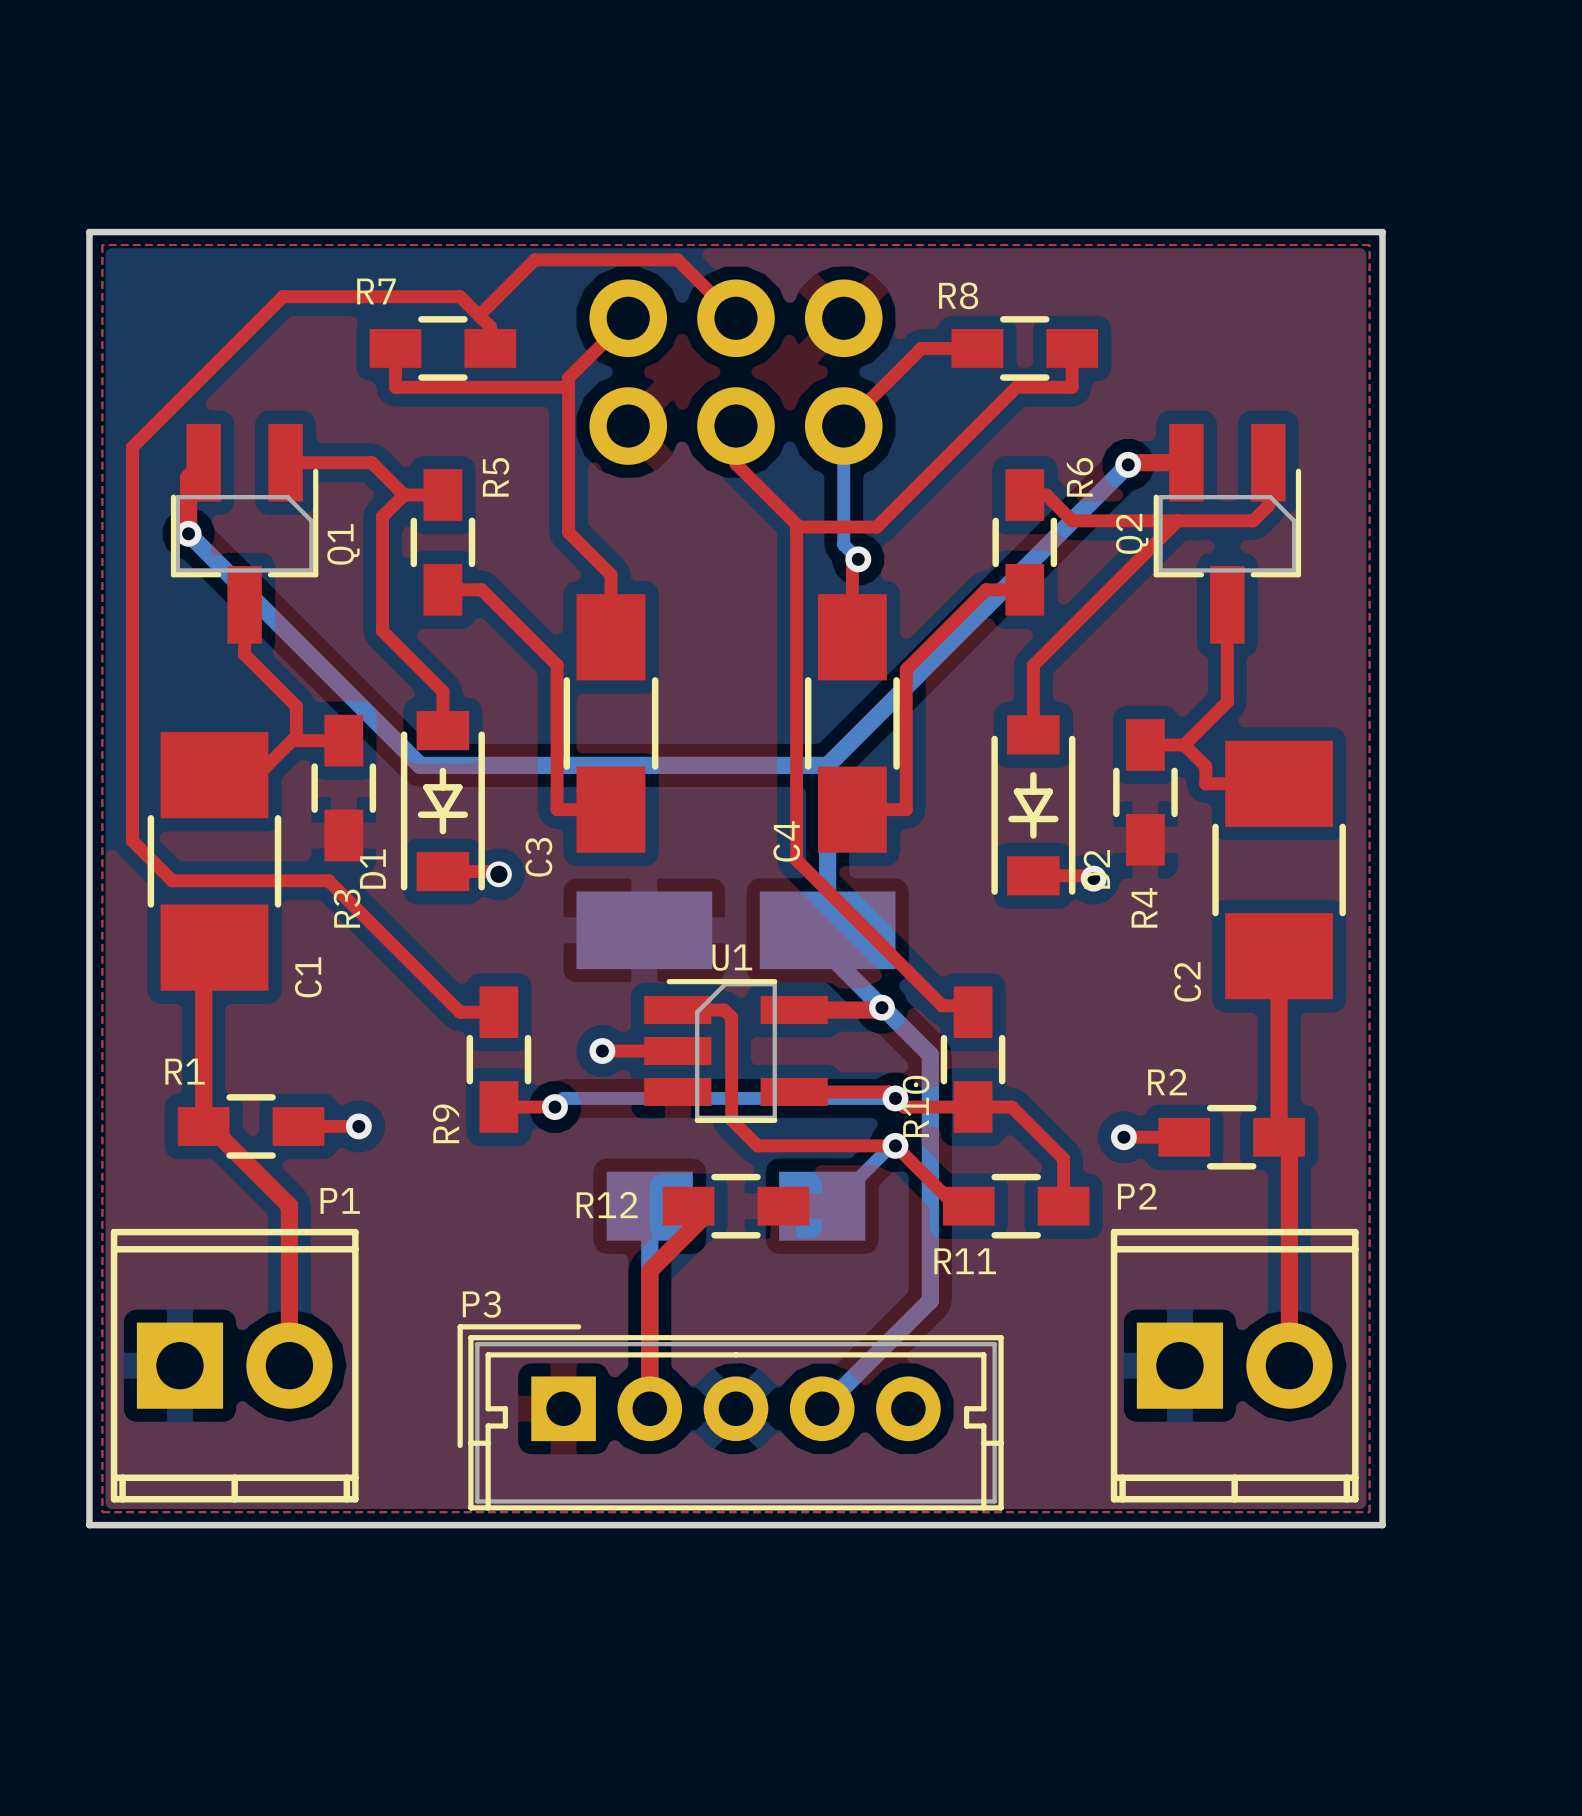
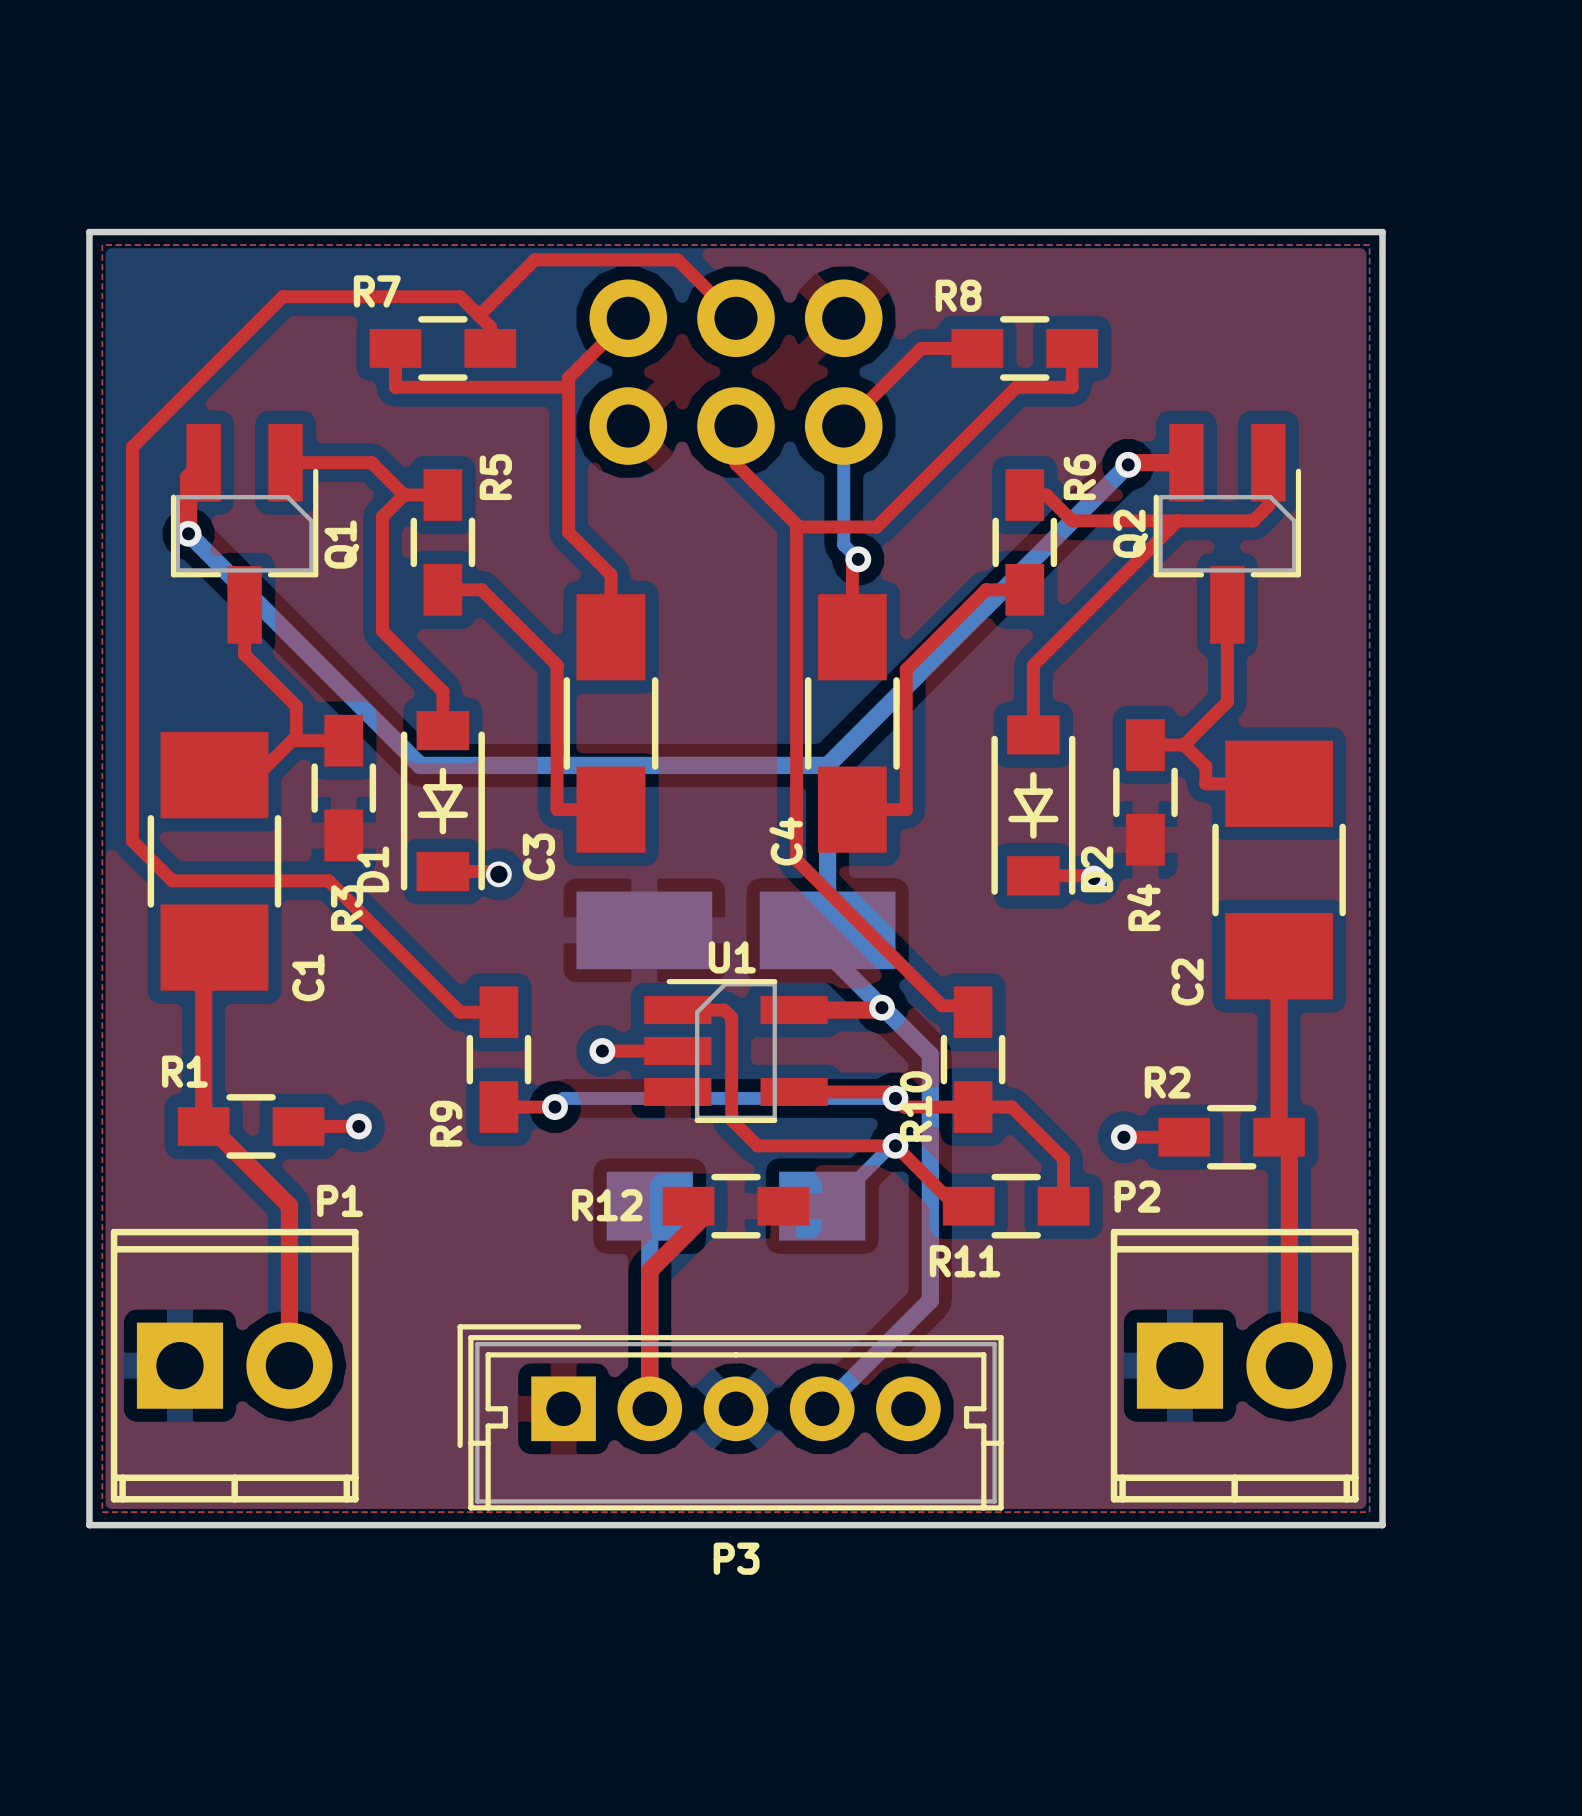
P3 name position: P3 (481, 1304) -> P3 (736, 1558)

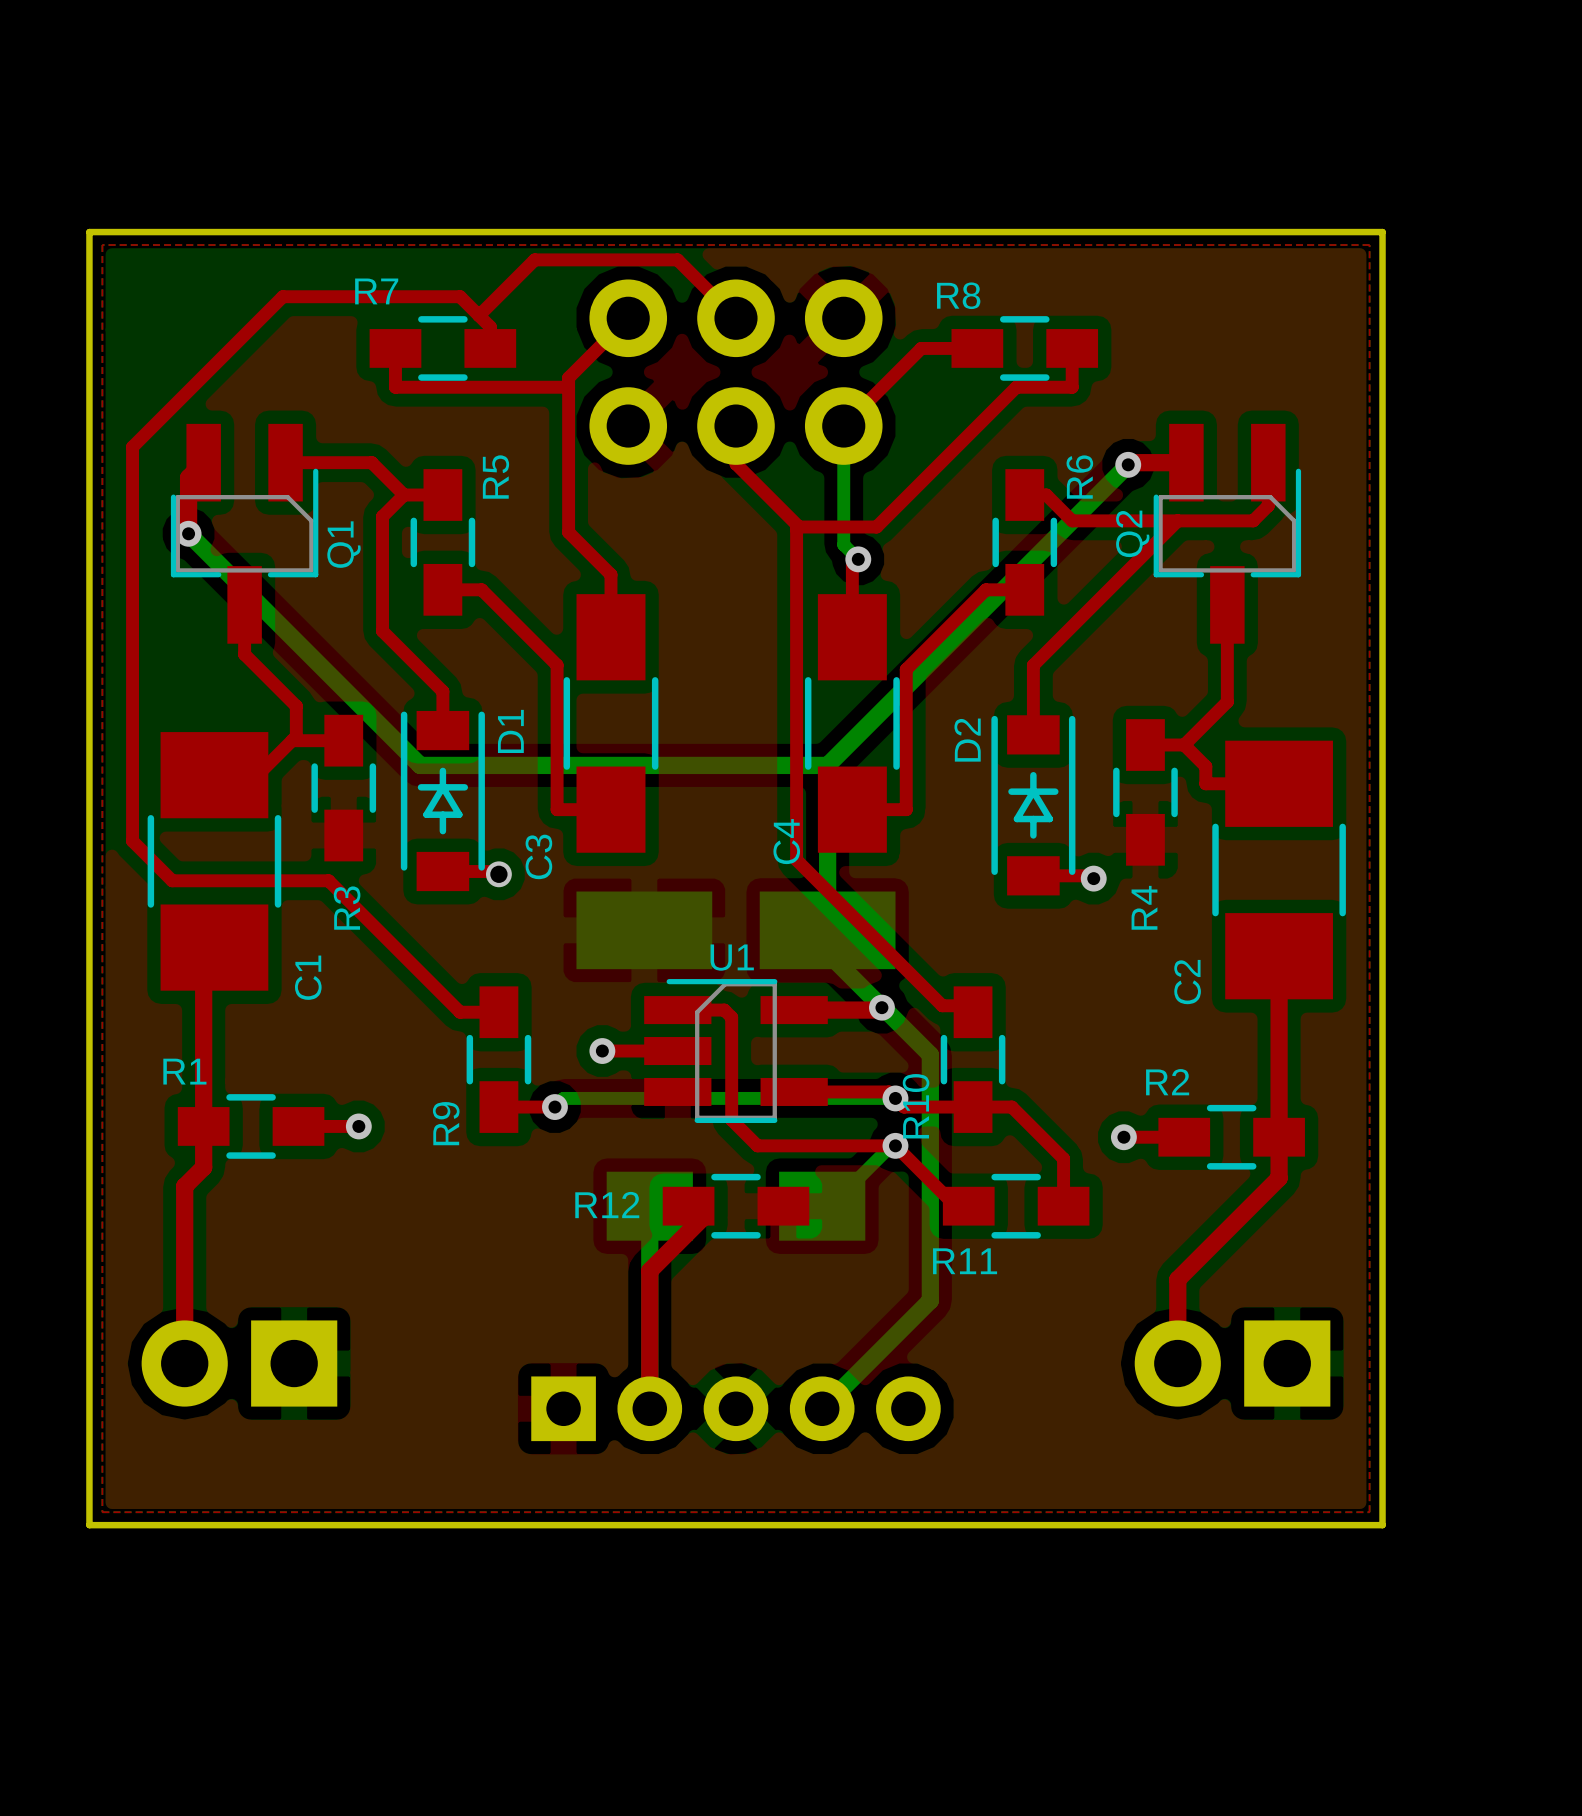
D1 rotation: 0° (442, 801) -> 180° (442, 801)
D2 rotation: 0° (1033, 805) -> 180° (1033, 805)
top track: (203, 1126) (210, 1126) (289, 1205) (289, 1365) -> (203, 1126) (203, 1167) (184, 1186) (184, 1363)
top track: (1279, 1137) (1289, 1147) (1289, 1365) -> (1279, 1137) (1279, 1178) (1177, 1279) (1177, 1363)
P1 side: top (234, 1365) -> bottom (239, 1363)
P2 side: top (1234, 1365) -> bottom (1232, 1363)
P3: (730, 1417) -> none

